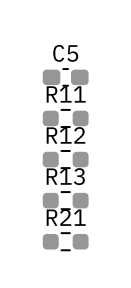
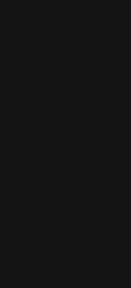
C5: (65, 77) -> none
R11: (65, 118) -> none
R12: (65, 159) -> none
R13: (65, 200) -> none
R21: (65, 241) -> none

